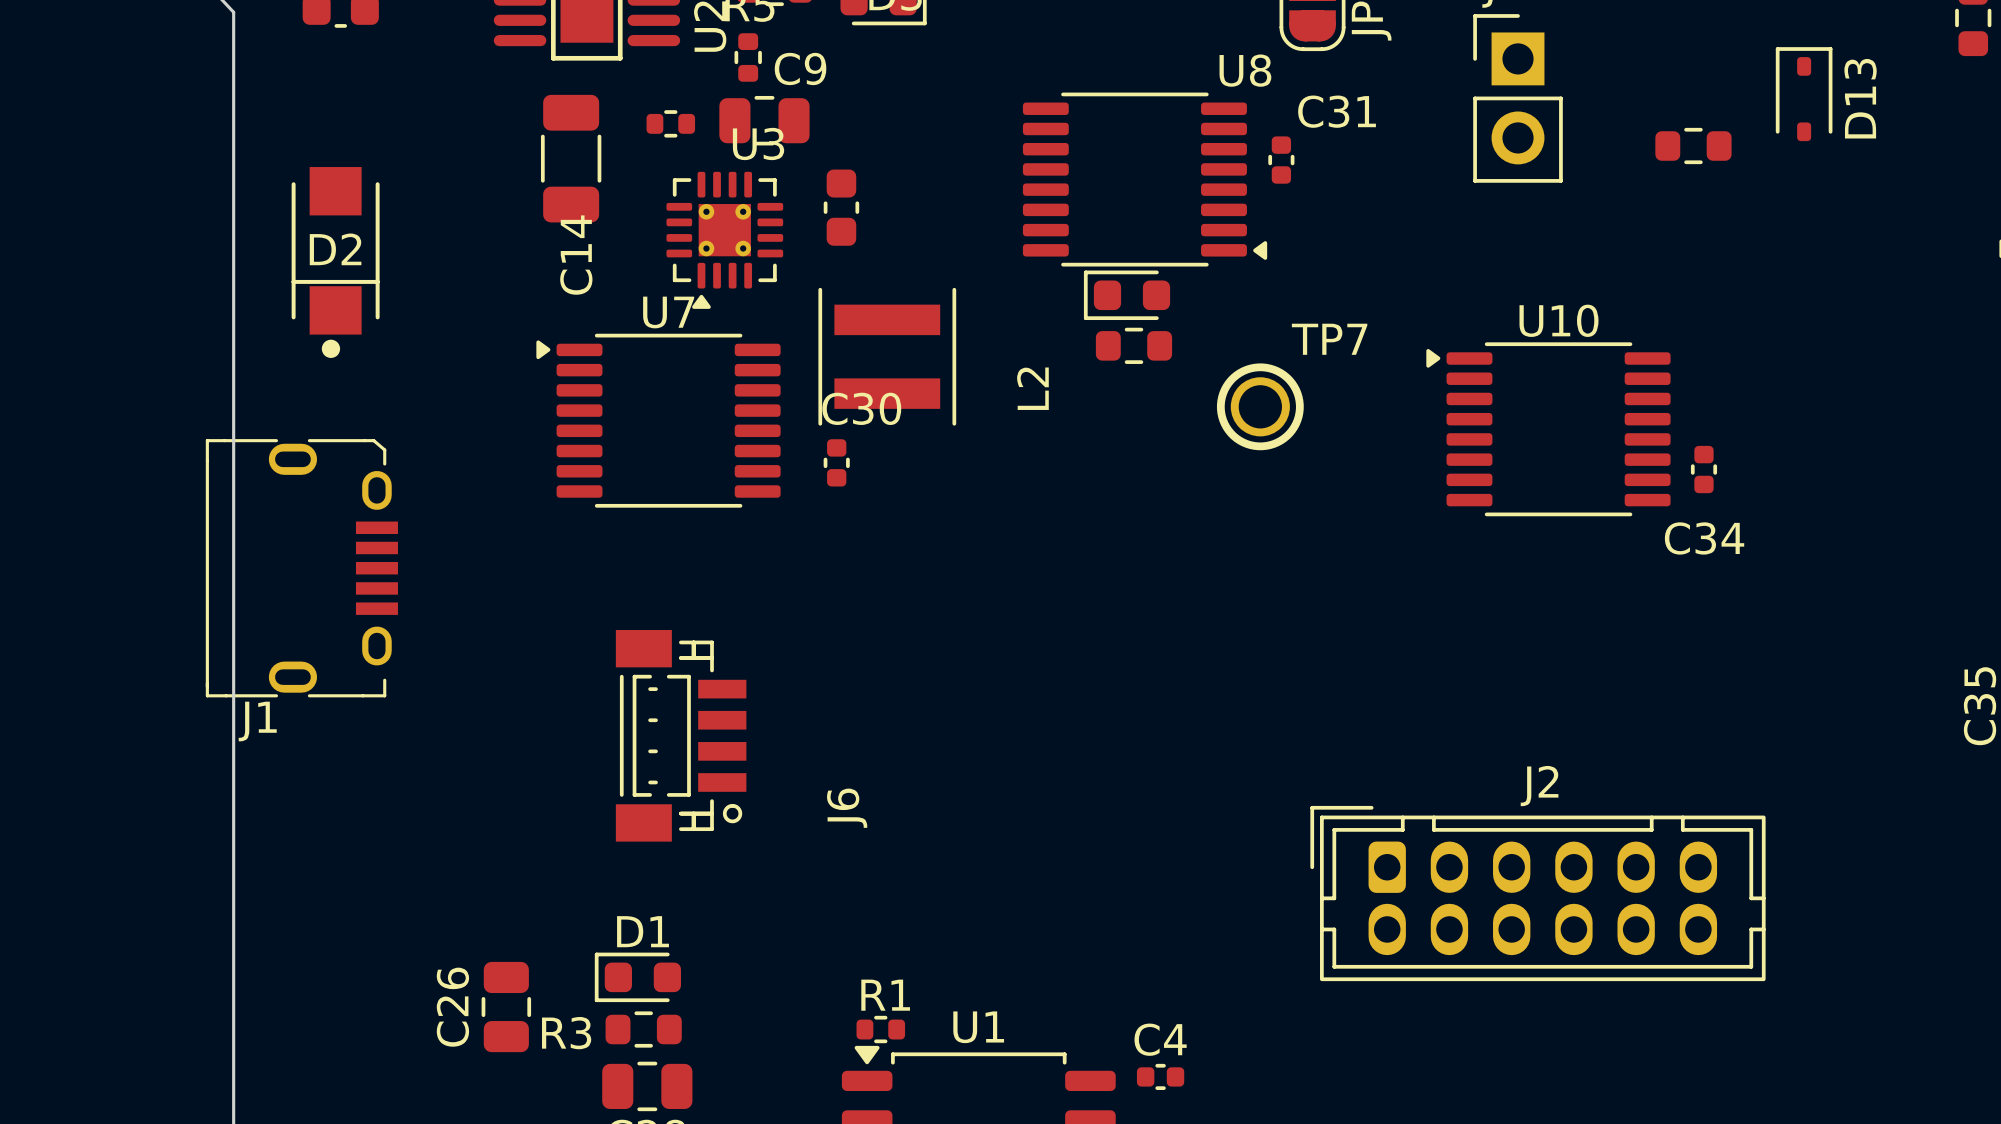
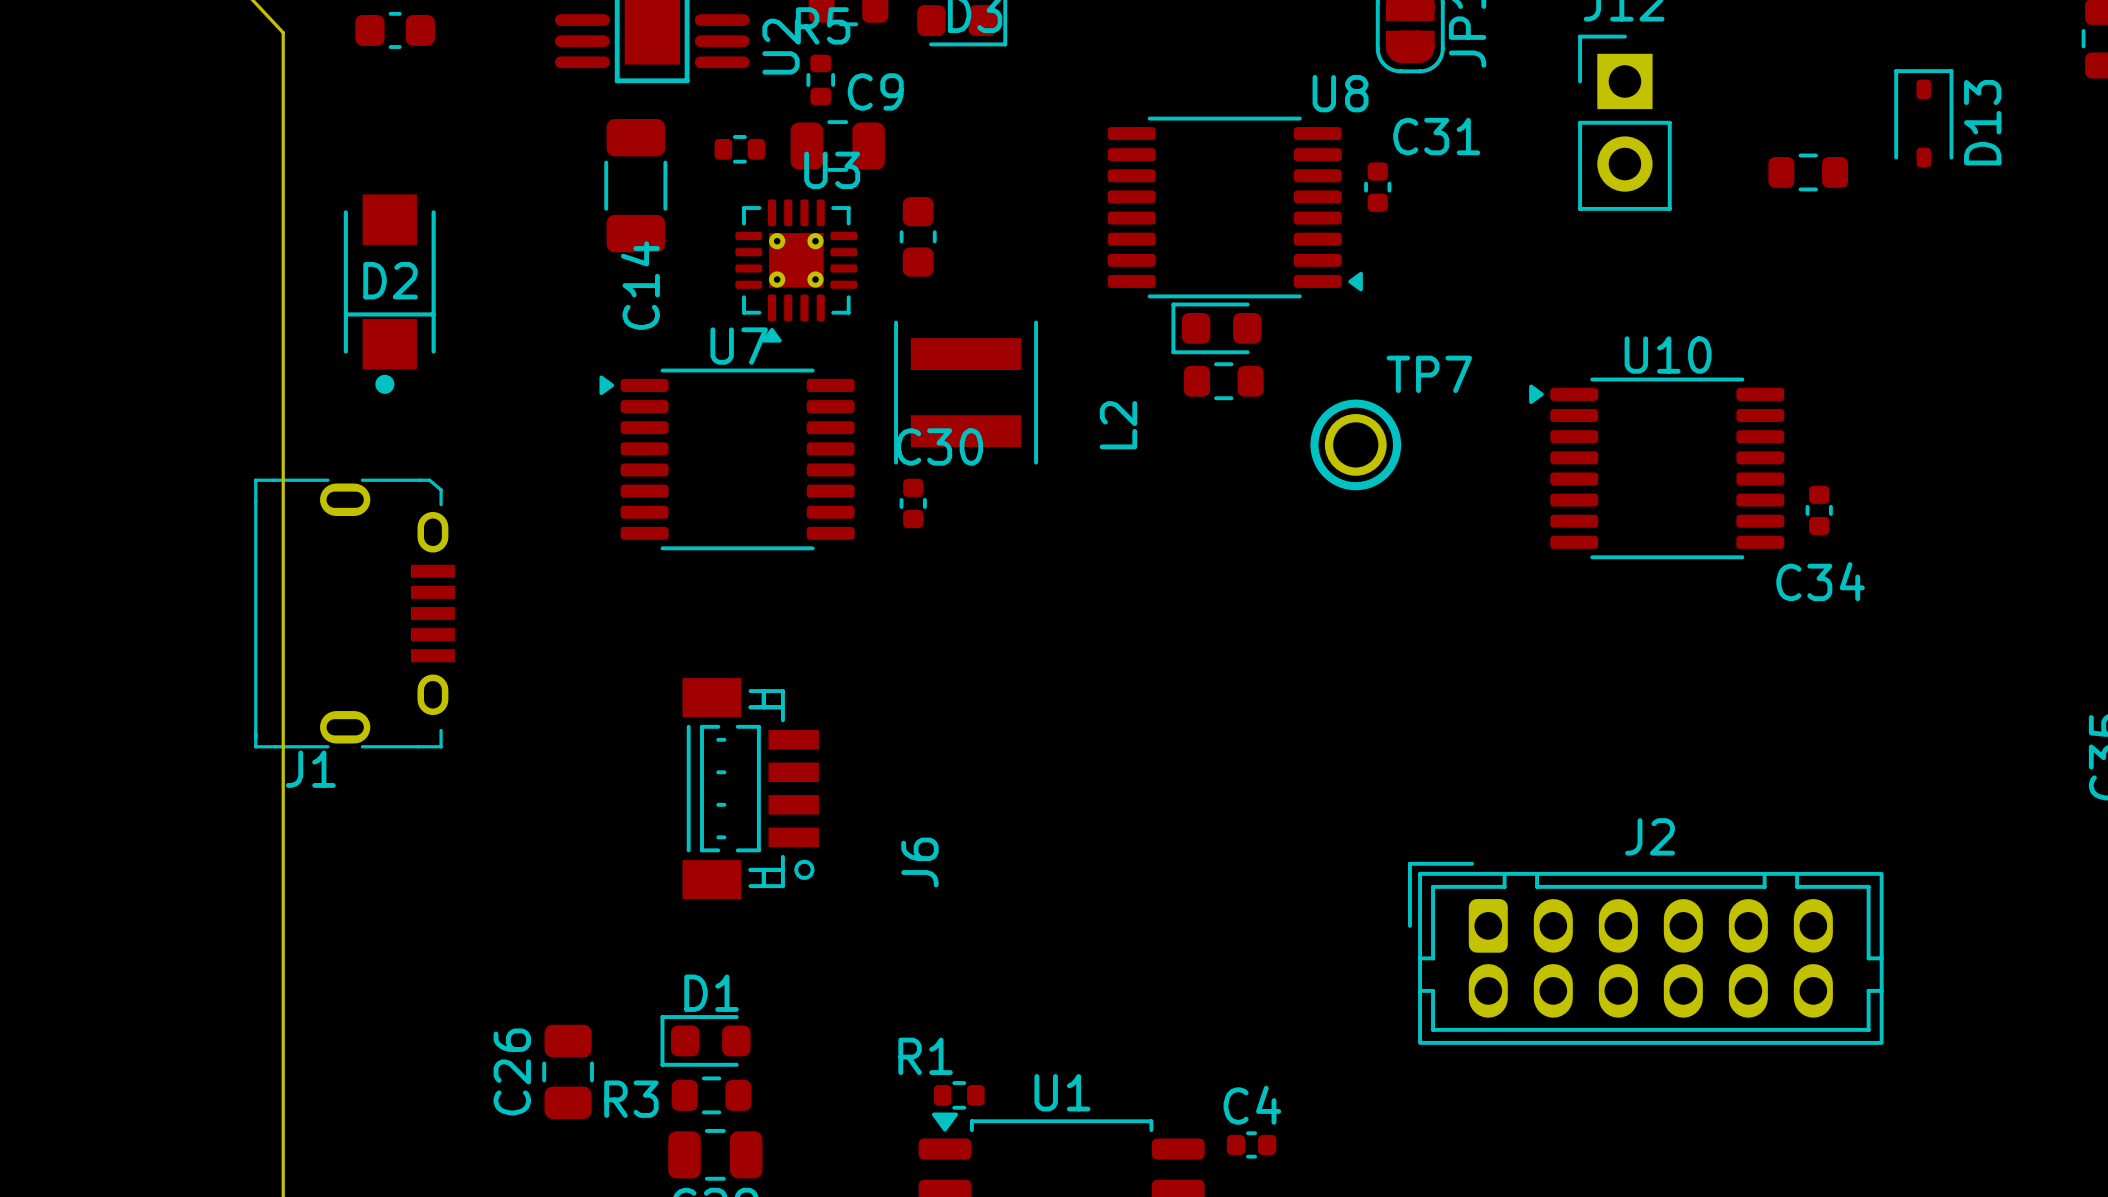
R1 name position: R1 (885, 995) -> R1 (925, 1056)

